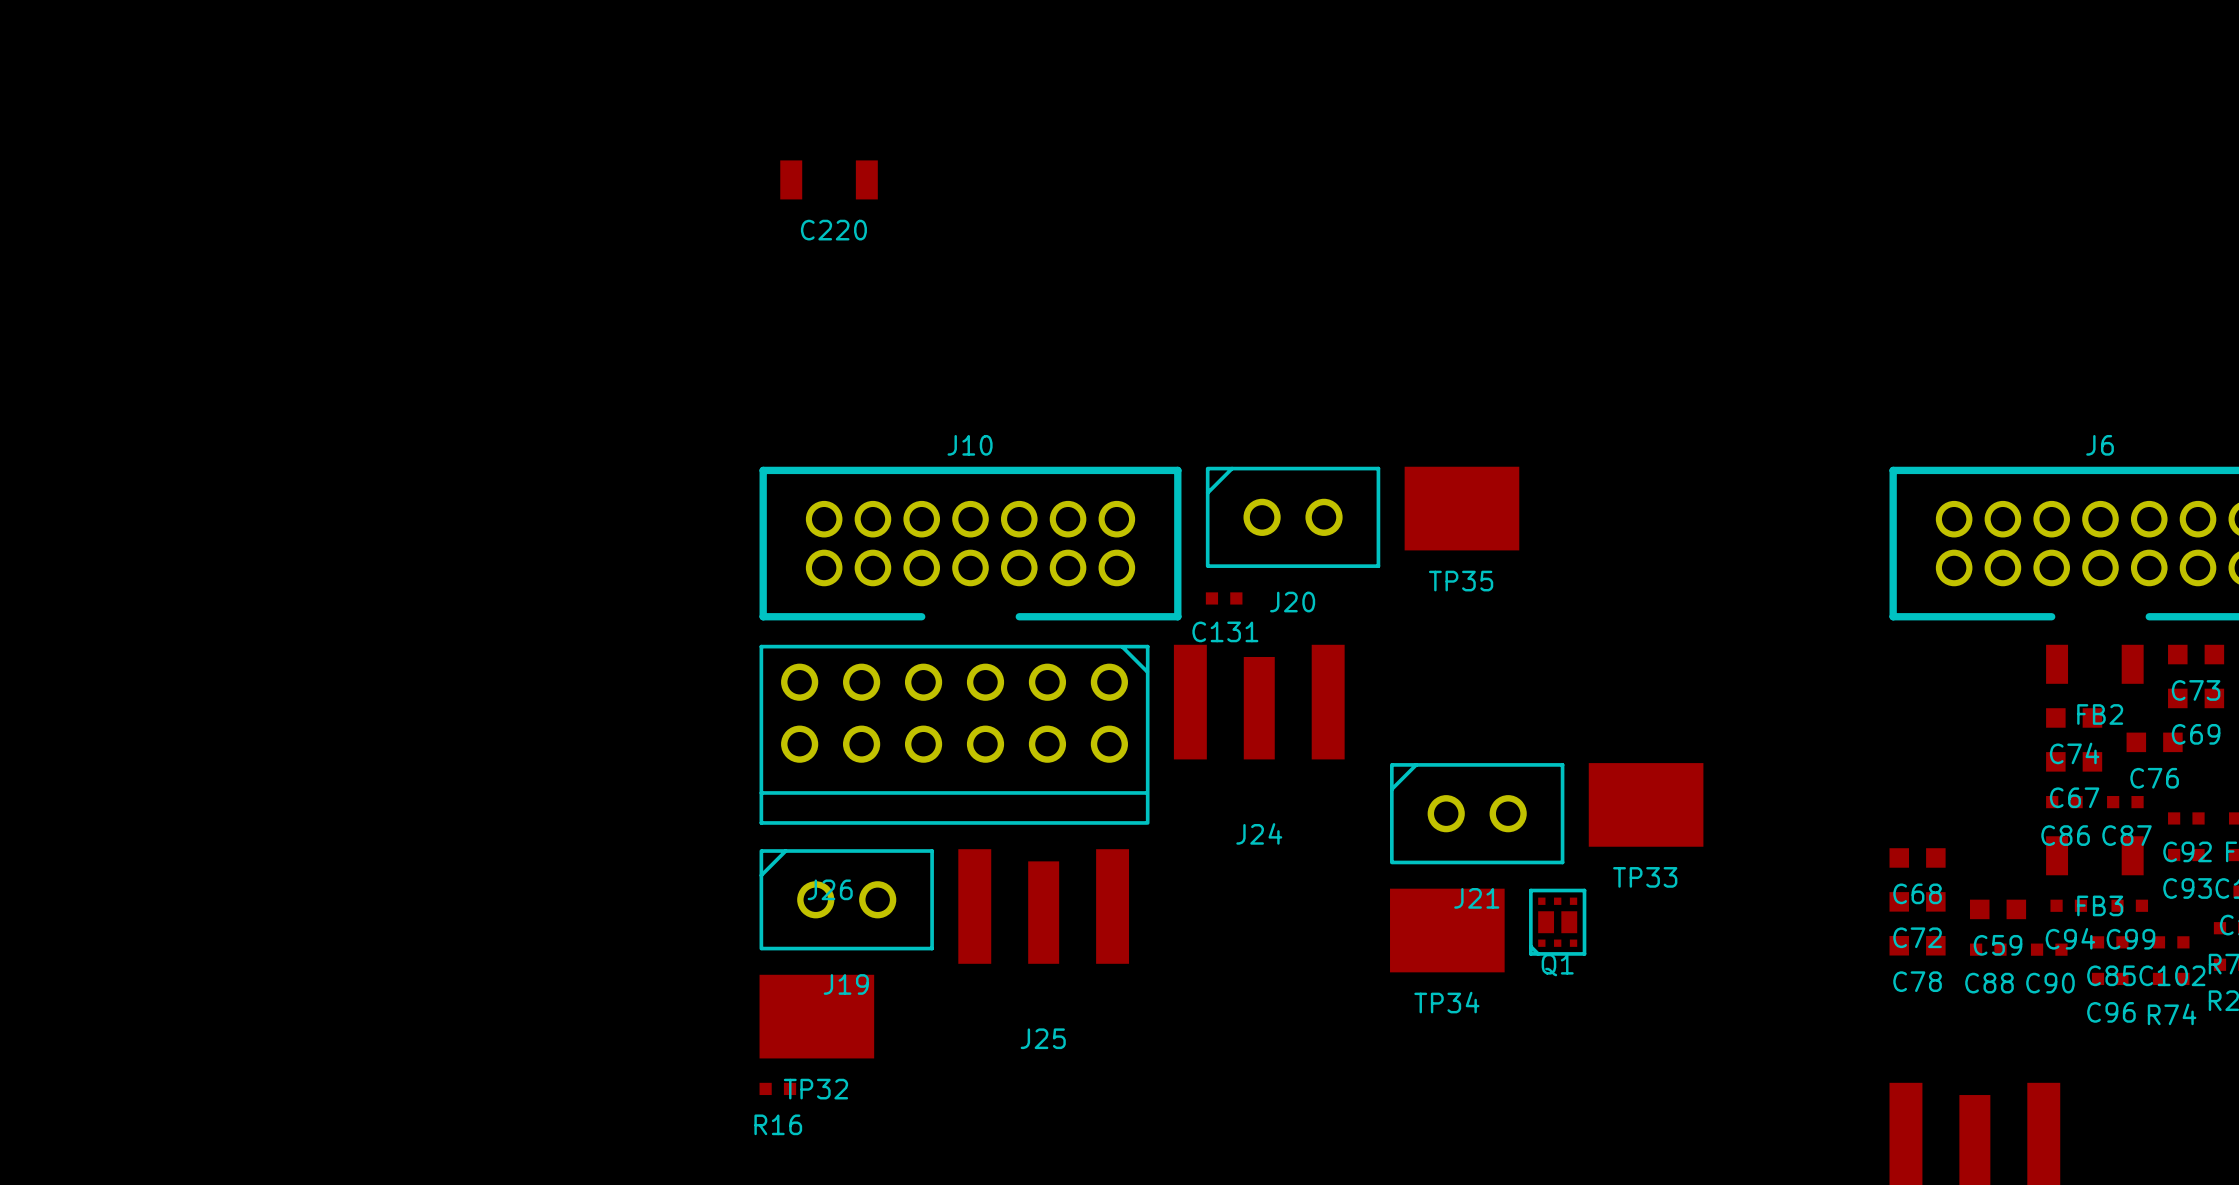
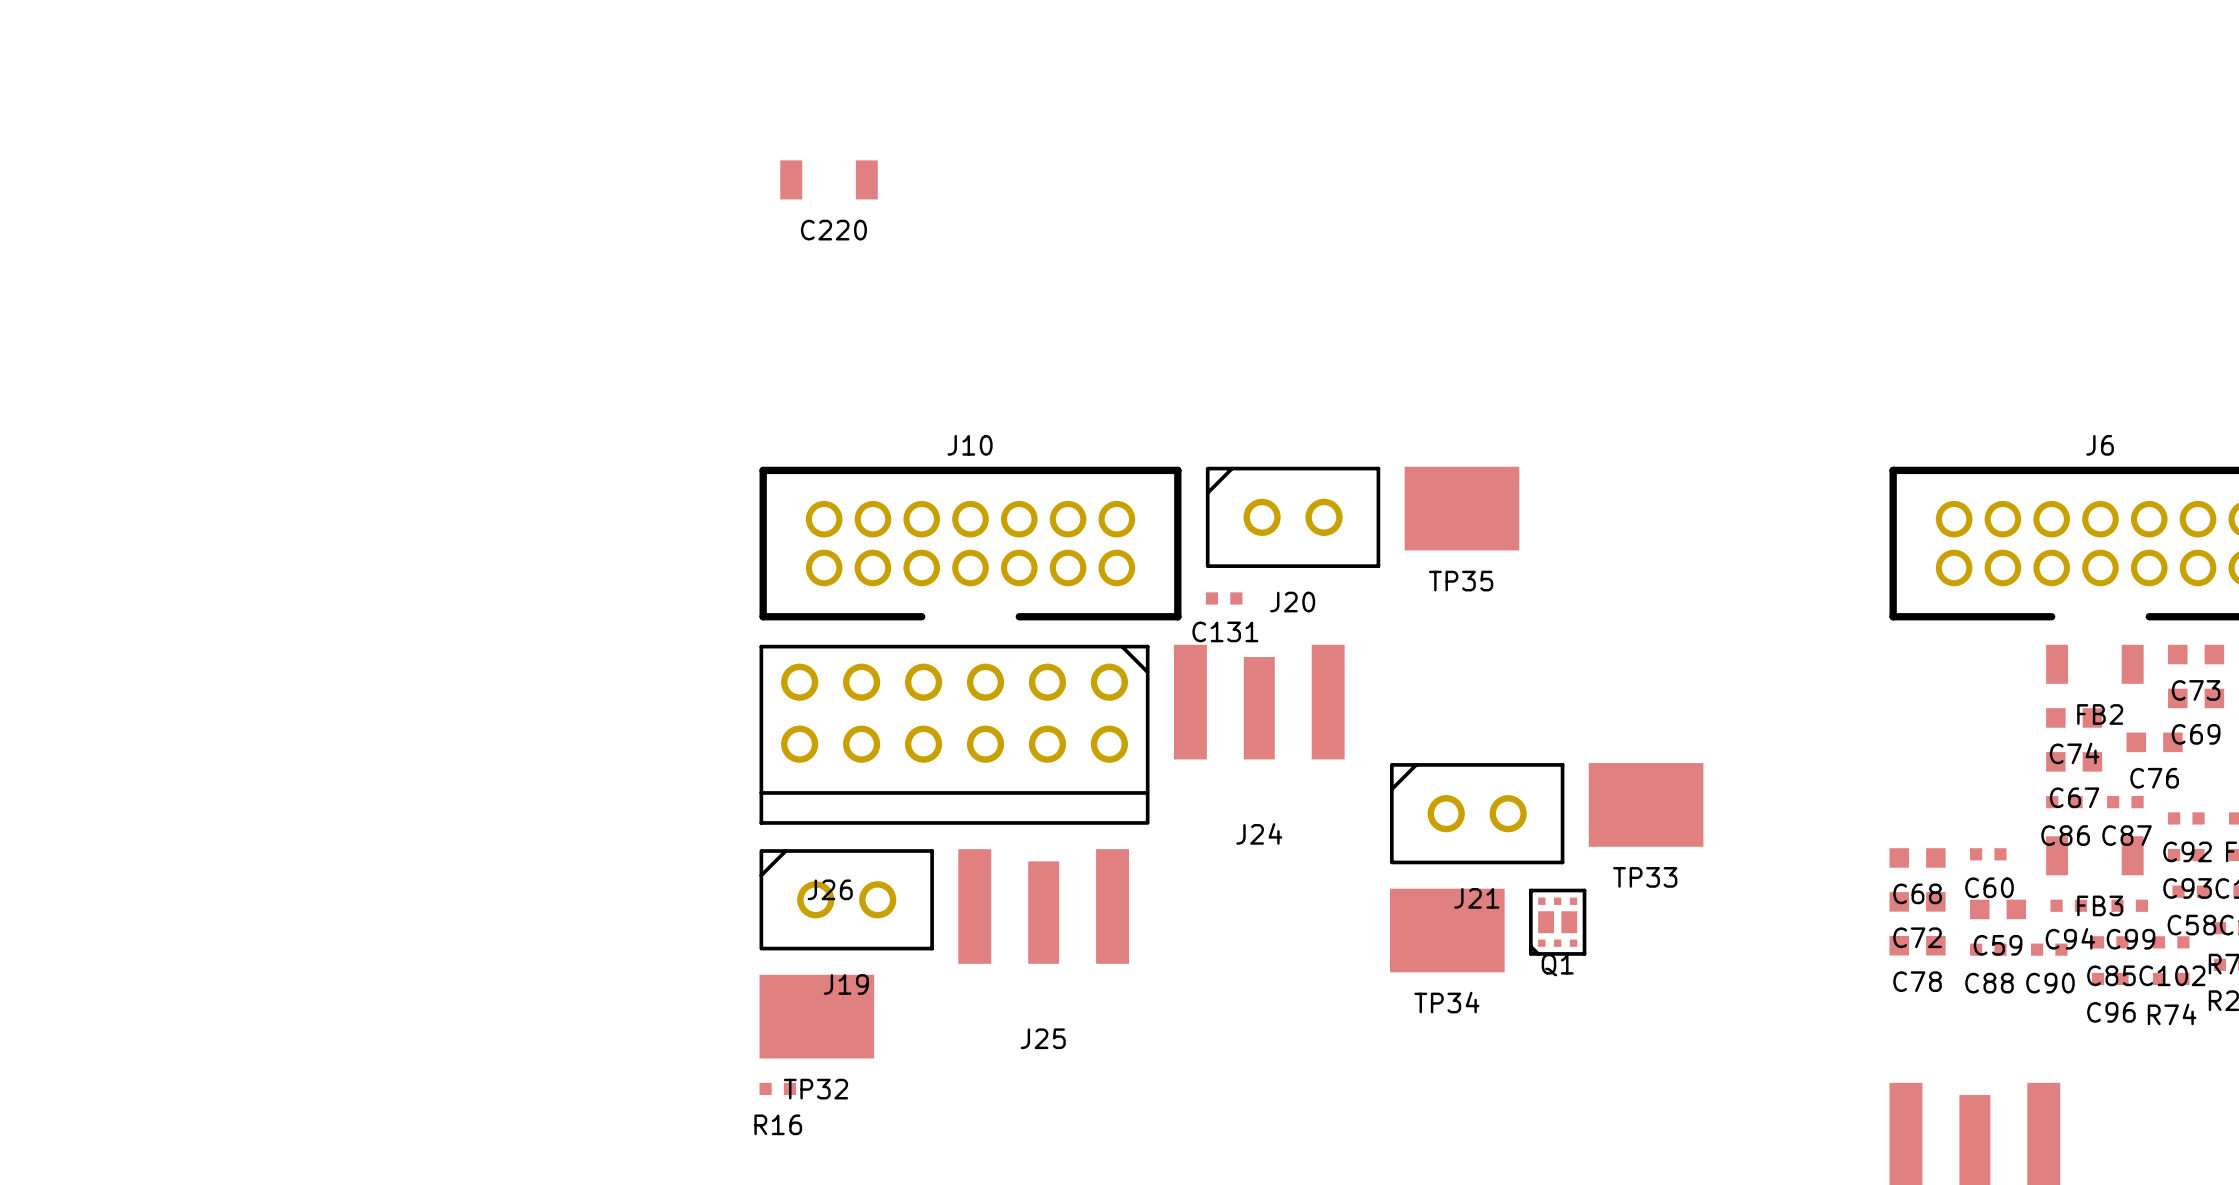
C60: none -> (1988, 854)
C58: none -> (2190, 891)

